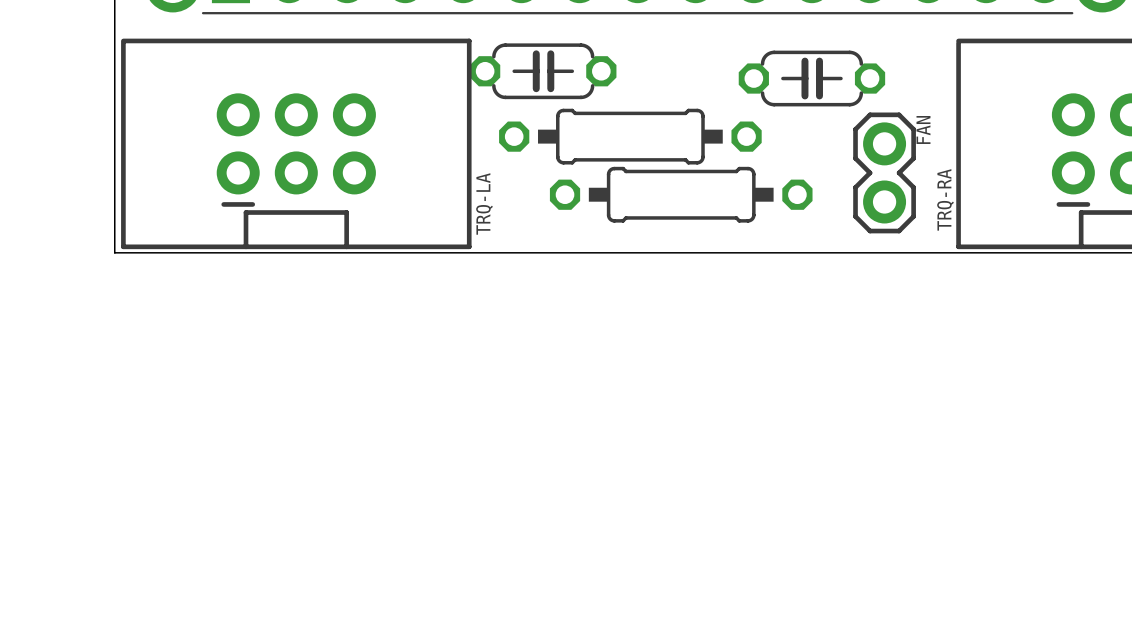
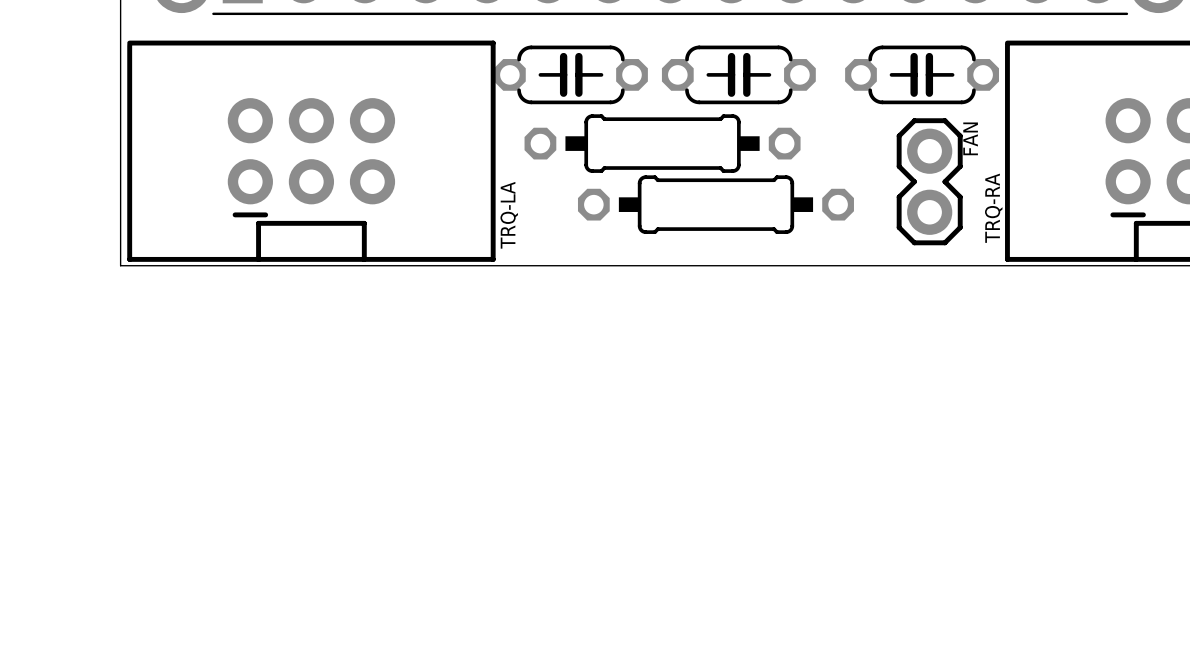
part: none -> (738, 74)
part: none -> (922, 74)
part: (811, 78) -> none

